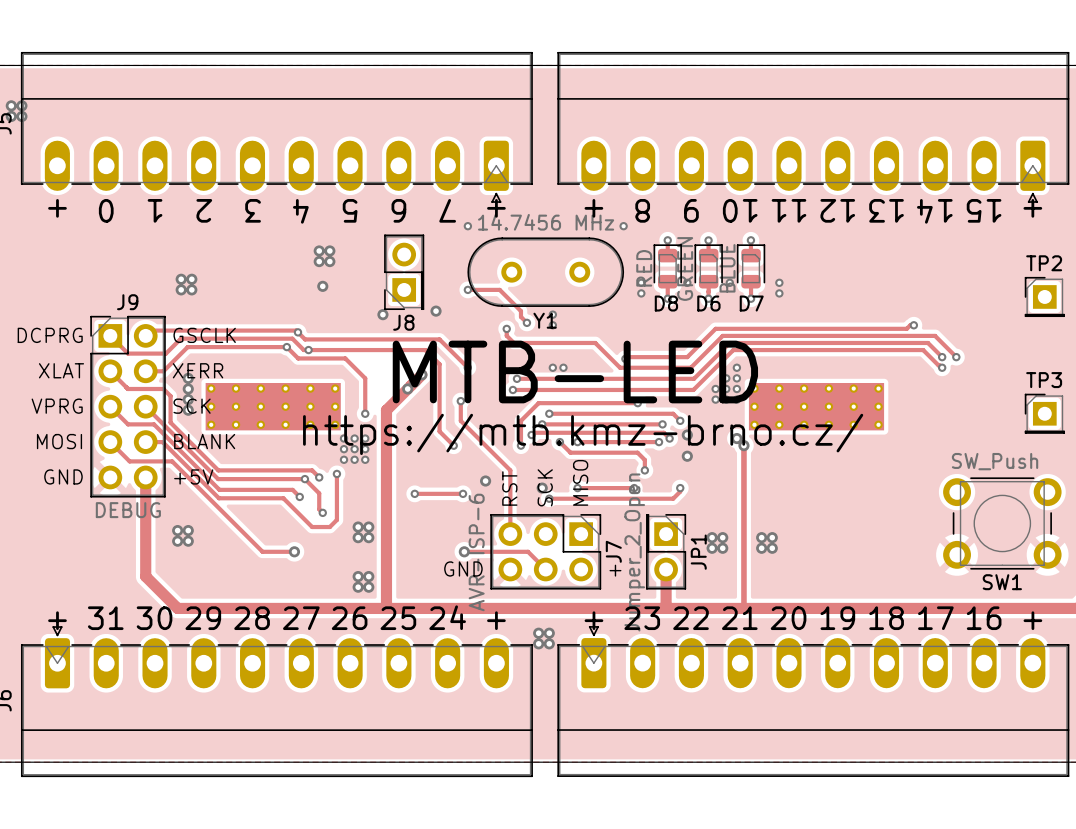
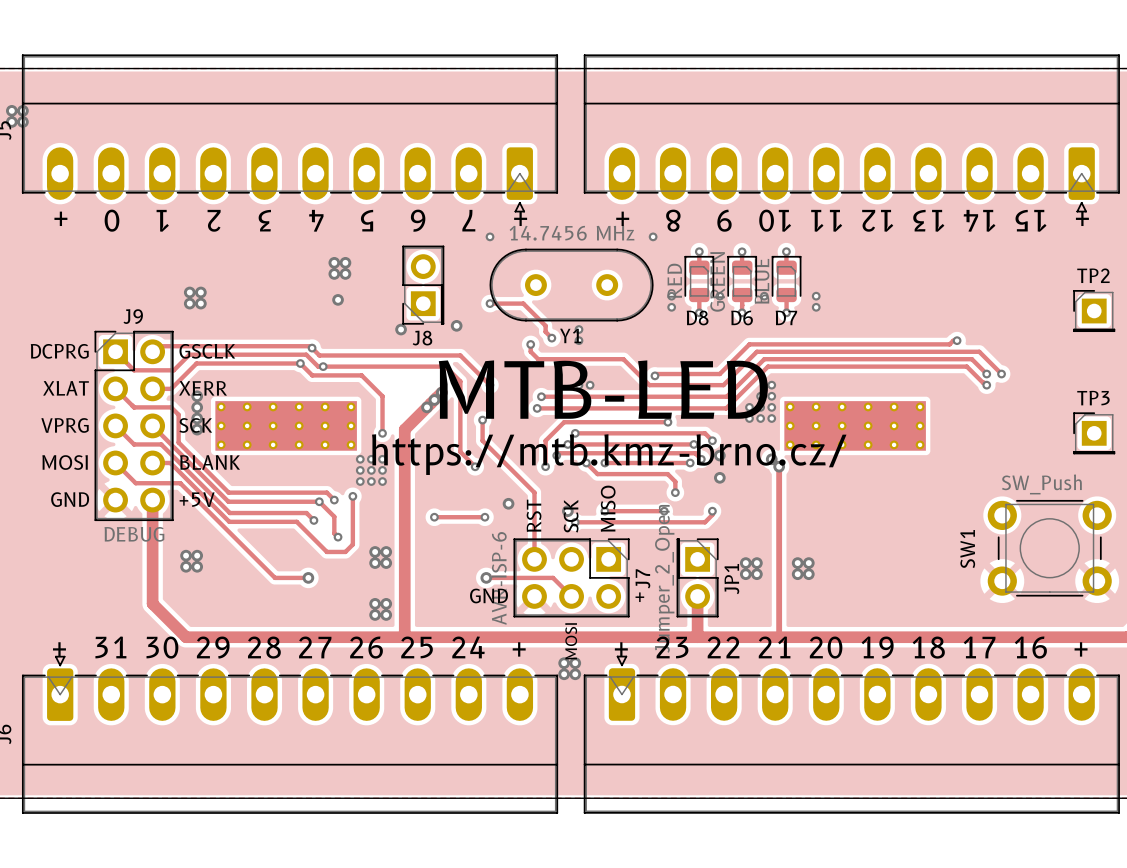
SW1 name rotation: 0° (1002, 582) -> 90° counterclockwise (967, 549)
SW1 name position: SW1 (1002, 582) -> SW1 (967, 549)
text: none -> MOSI (571, 641)

